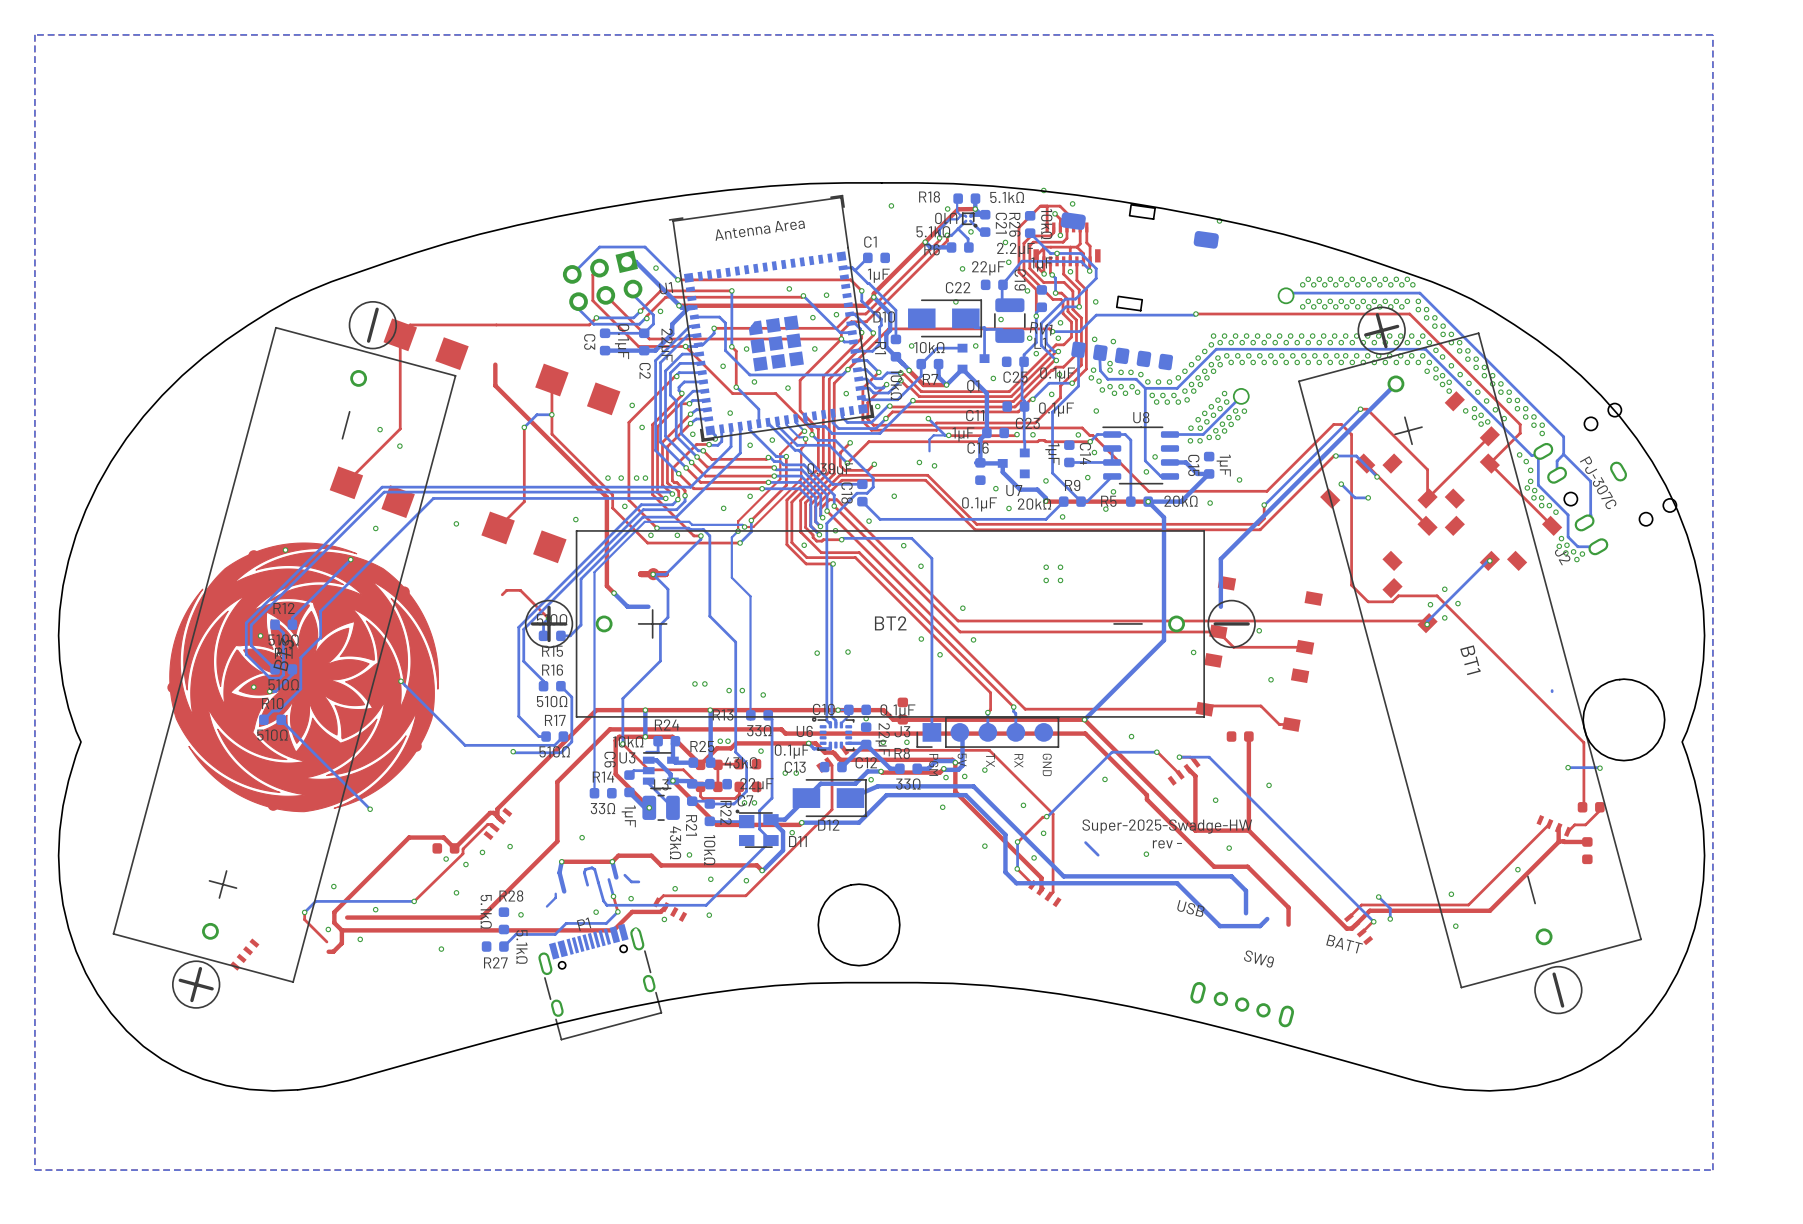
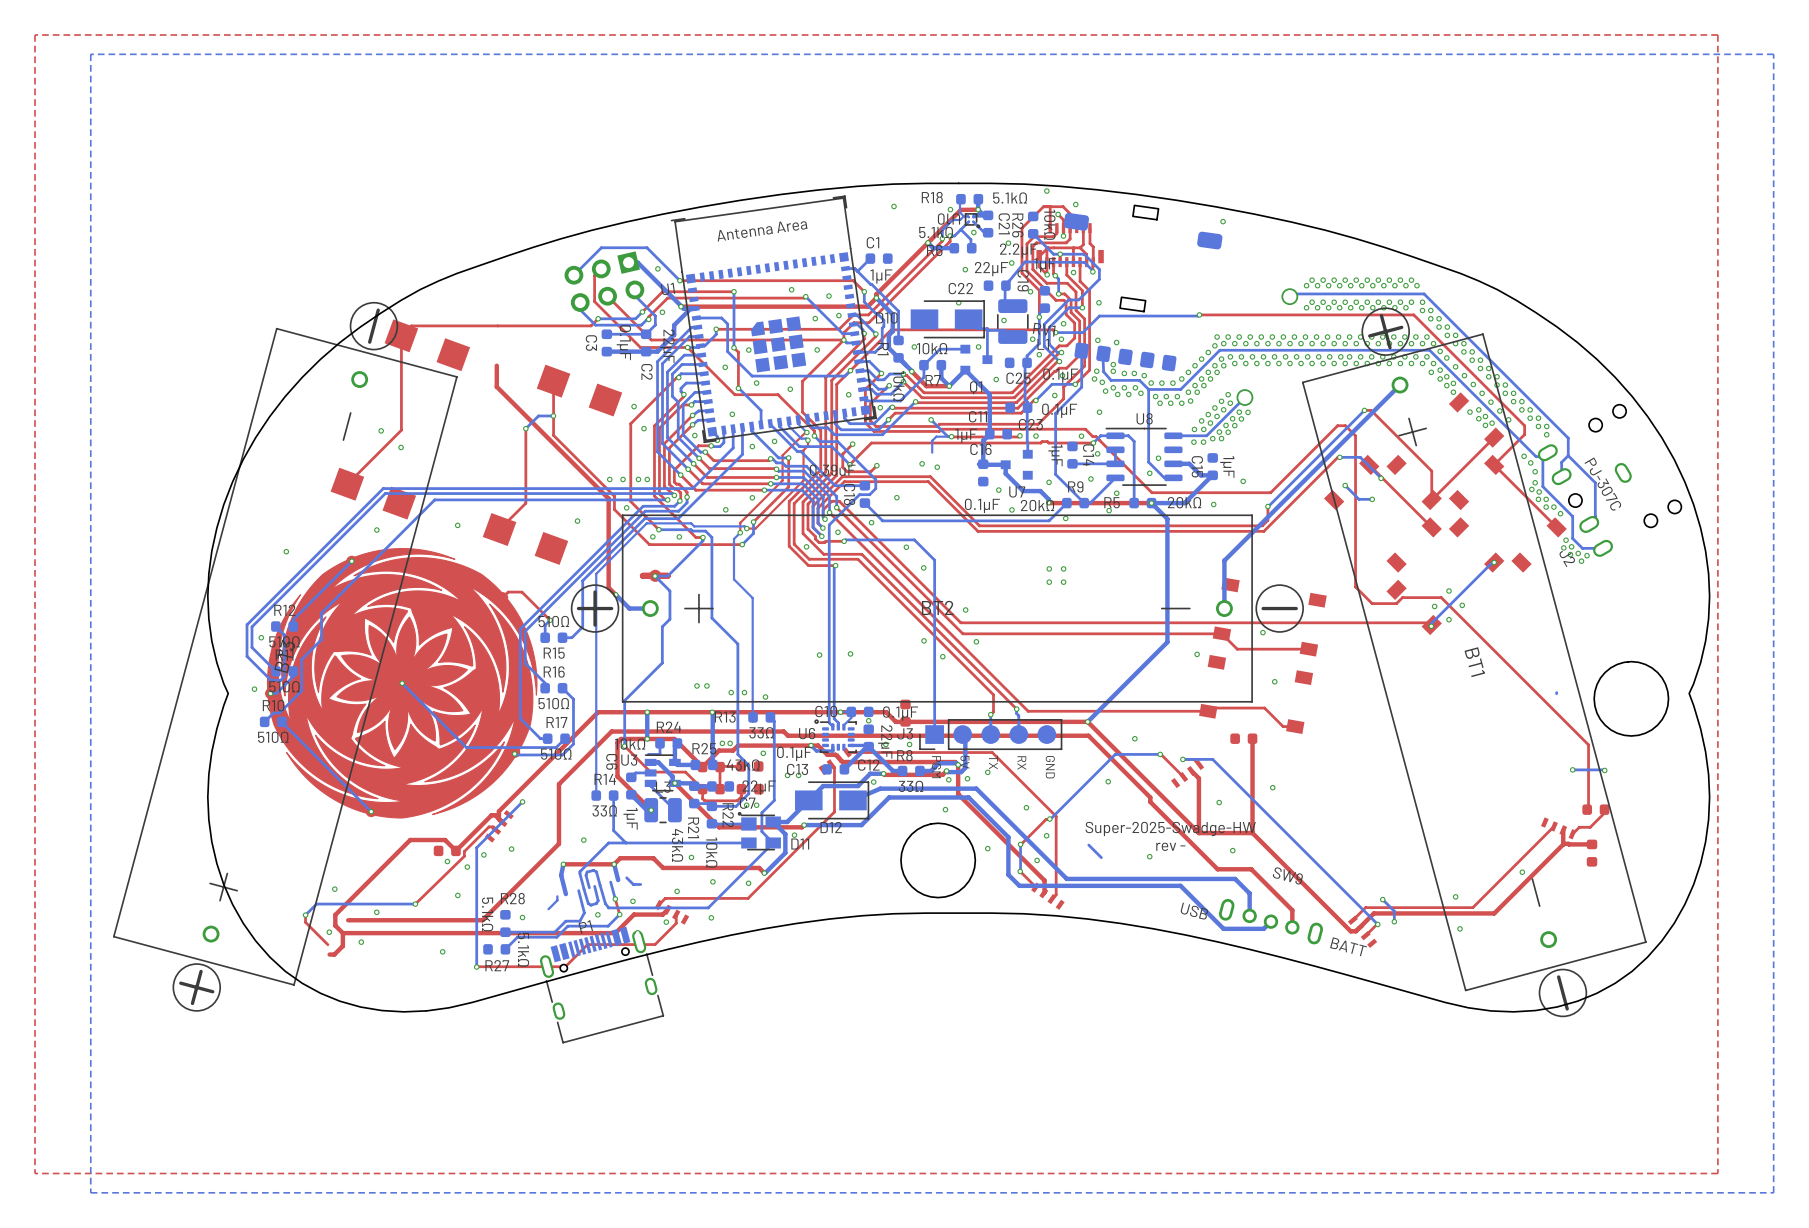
bottom zone outline: (1712, 34) (34, 34) (34, 1170) (1712, 1170) (1712, 34) -> (1773, 54) (90, 54) (90, 1192) (1773, 1192) (1773, 54)
drawing: [58, 182, 1706, 1092] -> none
drawing: none -> [207, 182, 1711, 1013]
BT2 position: (890, 623) -> (937, 608)
part position: (303, 677) -> (401, 683)
bottom track: none -> (613, 795) (613, 830) (626, 842)
bottom track: none -> (522, 801) (476, 847) (476, 967)
via: none -> (522, 801)
bottom track: none -> (748, 842) (608, 842) (579, 871) (588, 903) (591, 905) (598, 900) (594, 886)
bottom track: none -> (578, 890) (584, 912) (579, 921) (565, 921) (554, 932) (505, 932)
top track: none -> (676, 914) (676, 923) (655, 944) (587, 944) (565, 966) (477, 966)
part: (244, 954) -> none
via: none -> (476, 967)
SW9 position: (1242, 1004) -> (1270, 921)

